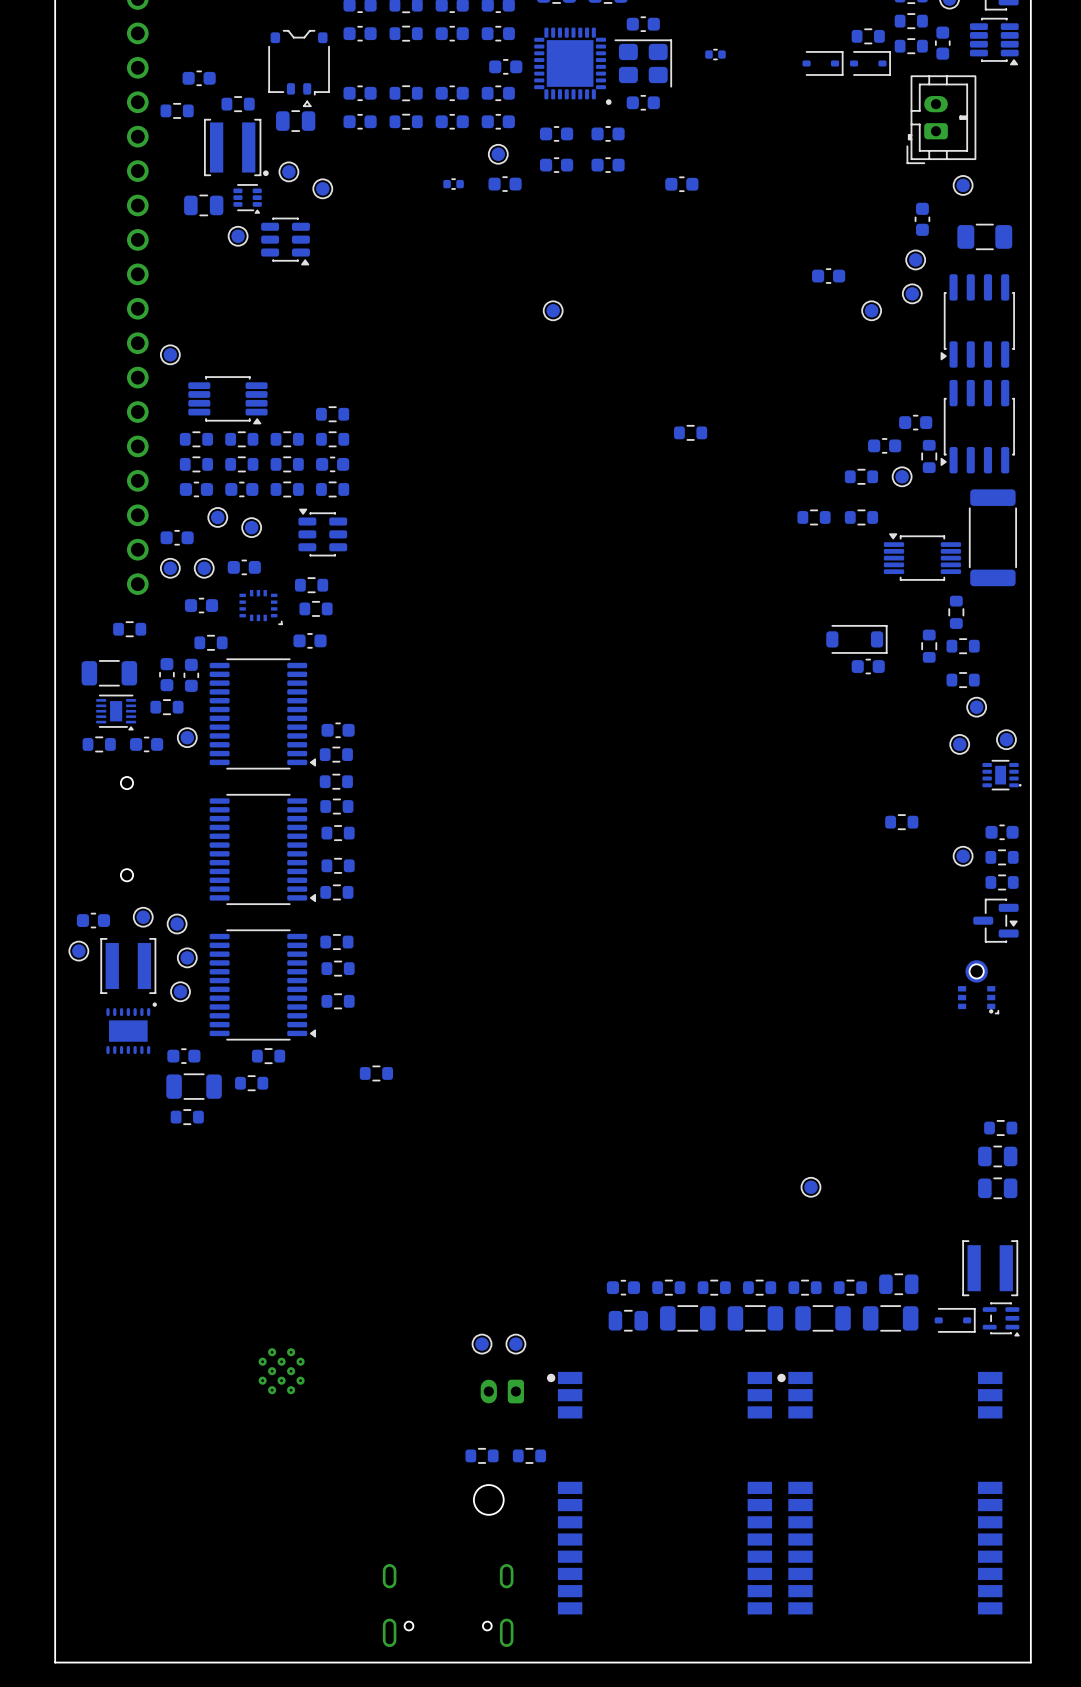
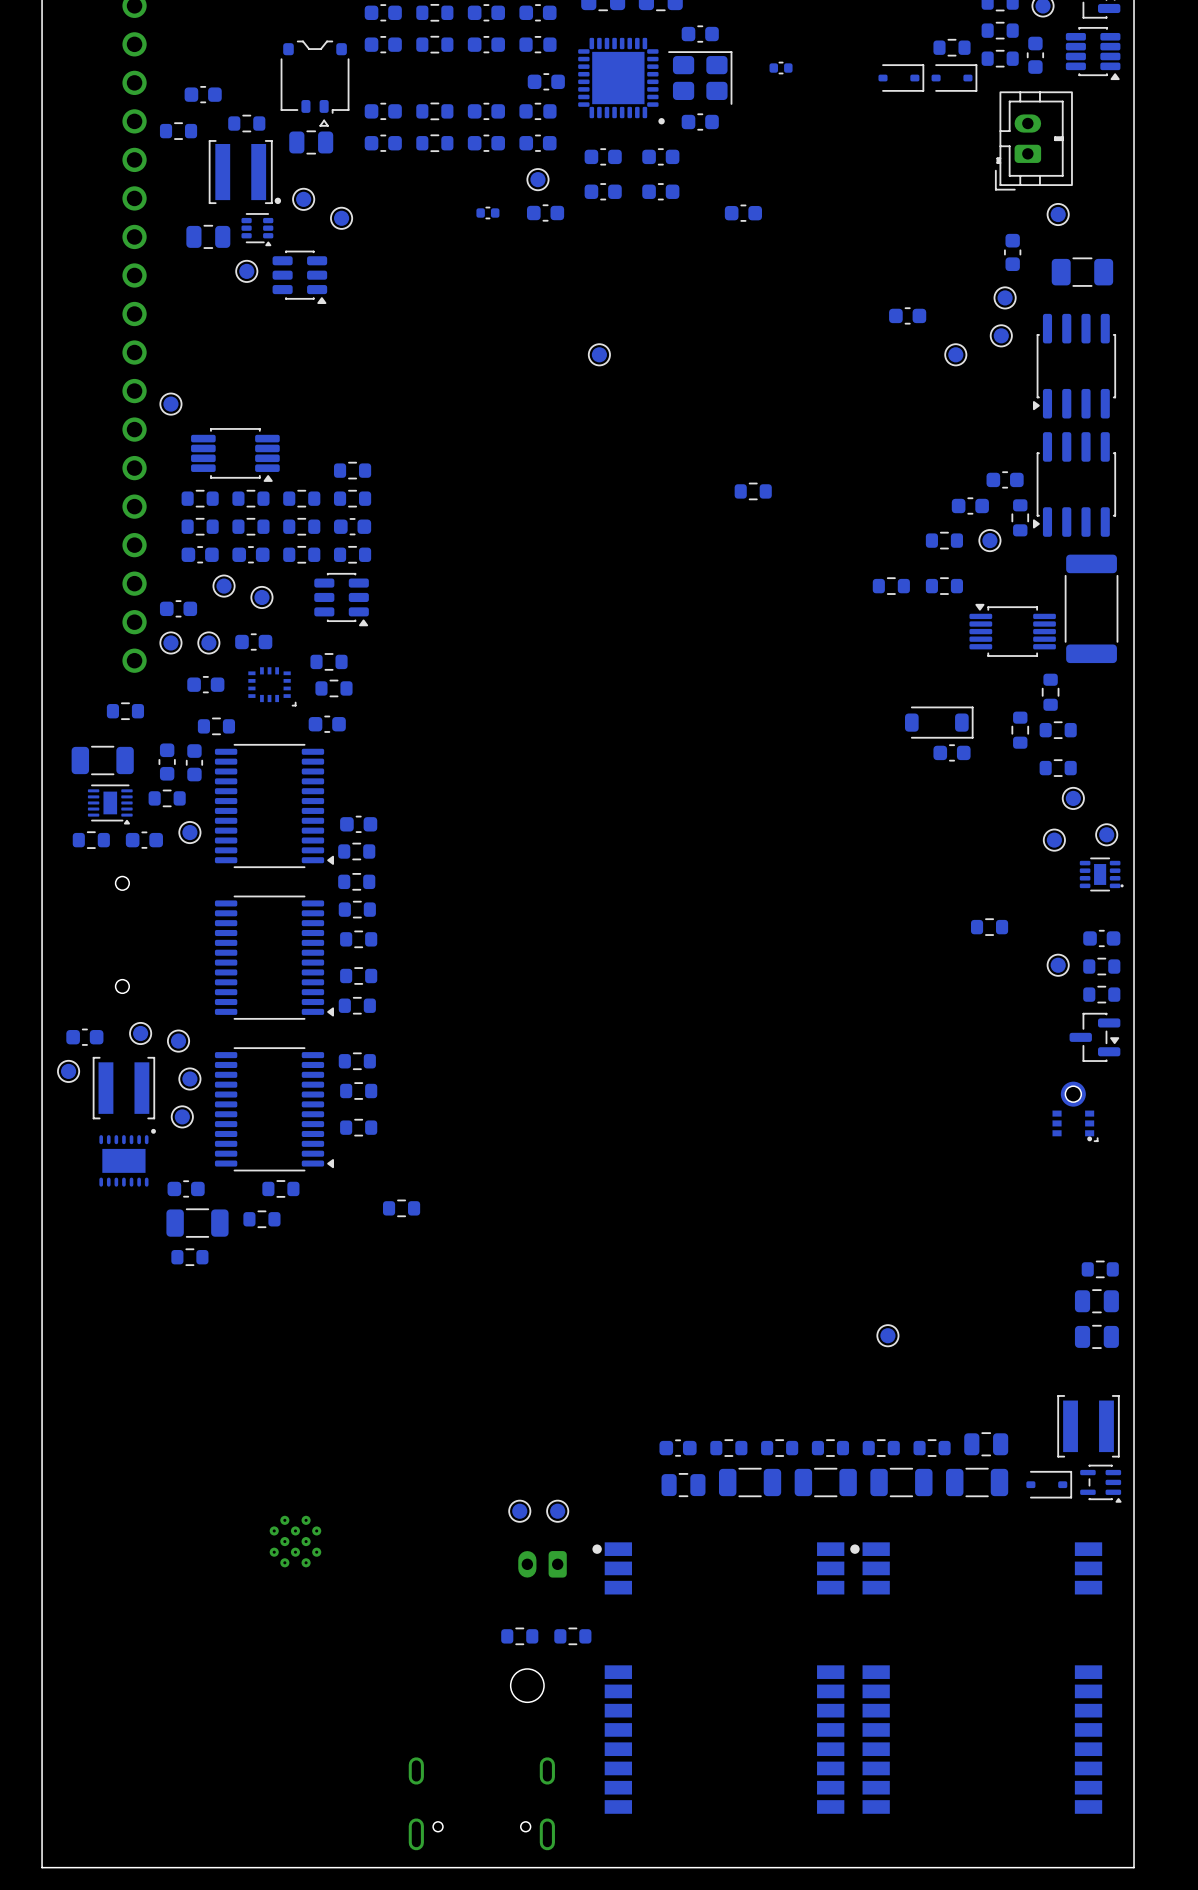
part rotation: 0° (322, 532) -> 180° (341, 599)

